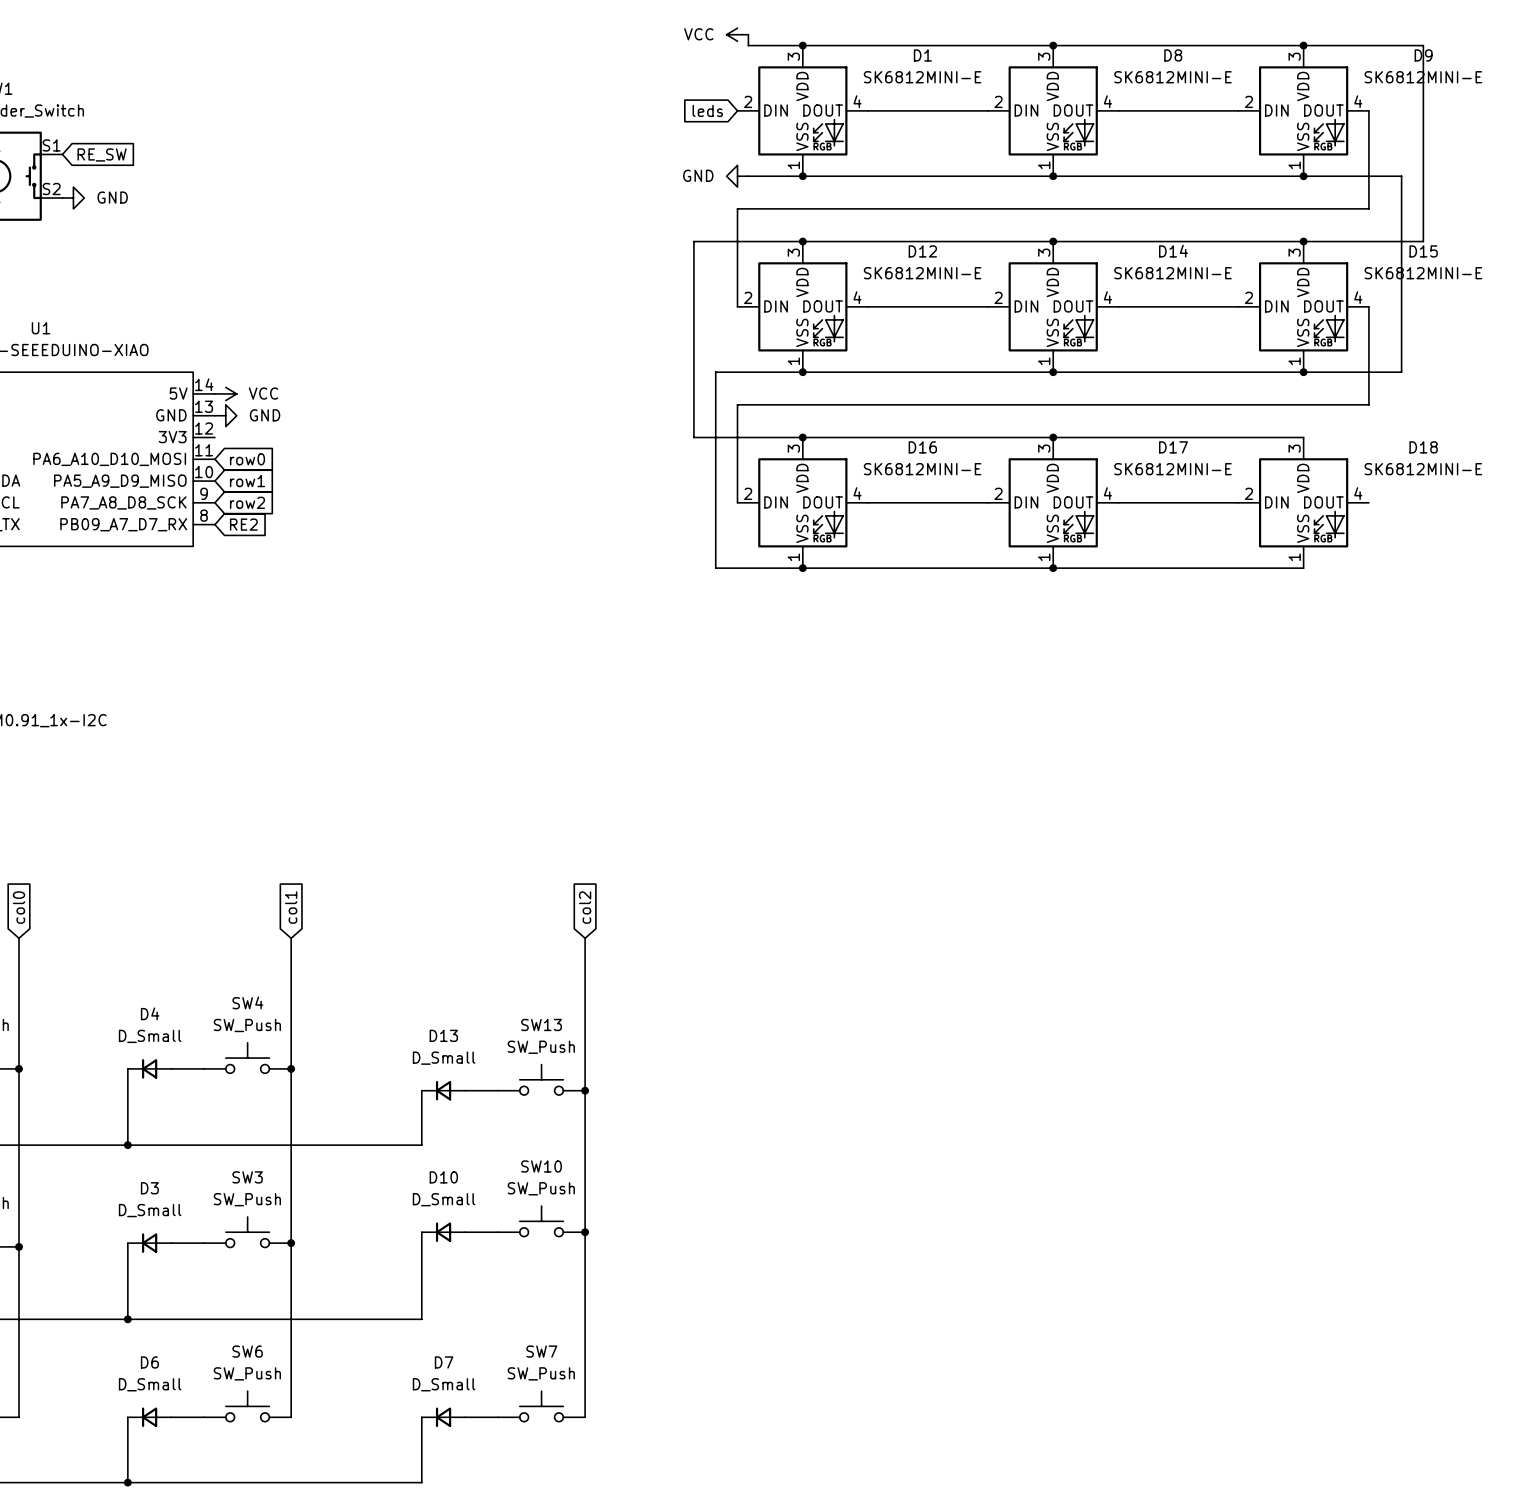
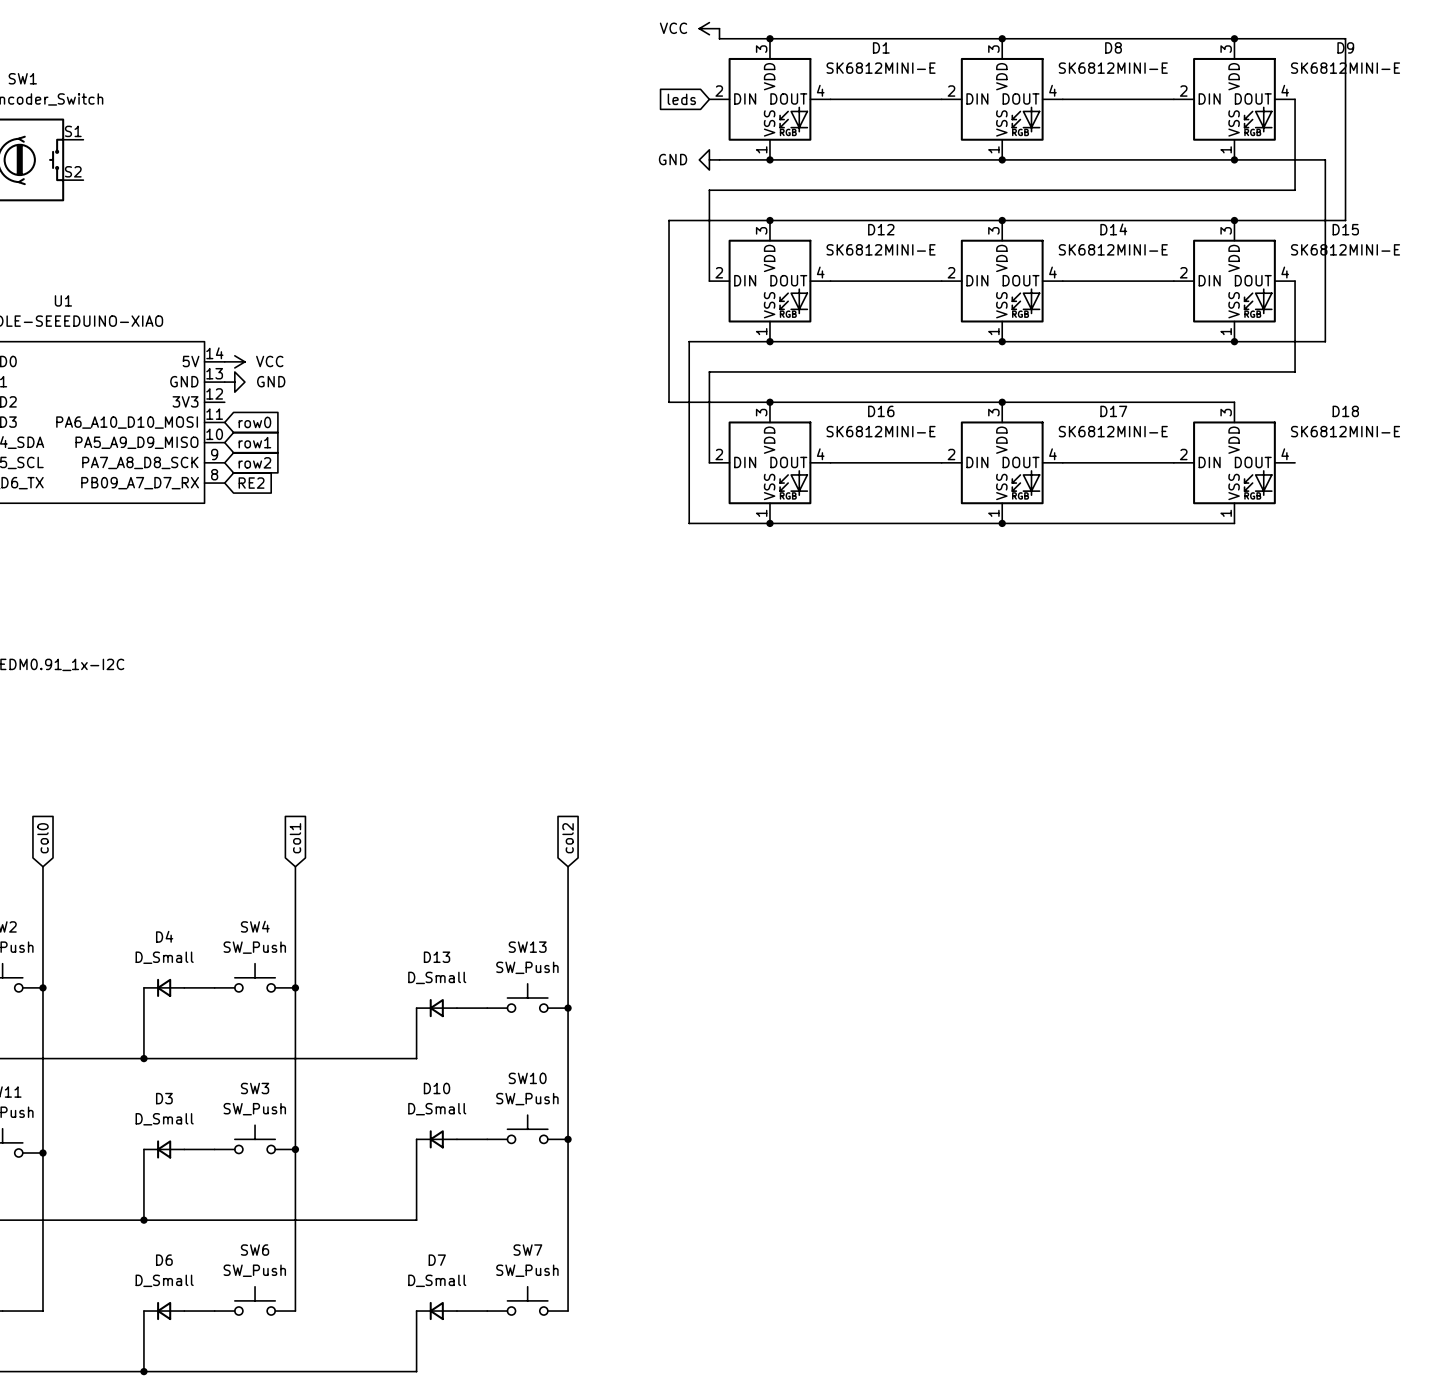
global label: RE_SW (102, 154) -> none
power symbol: GND (73, 198) -> none

